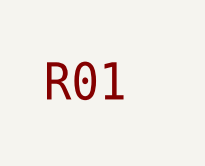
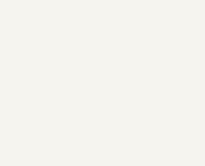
text: R01 (85, 80) -> none

